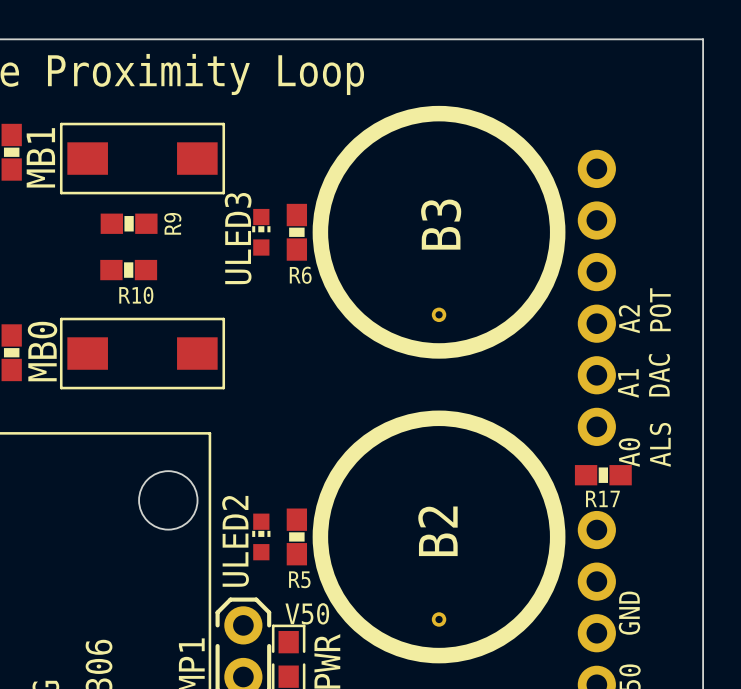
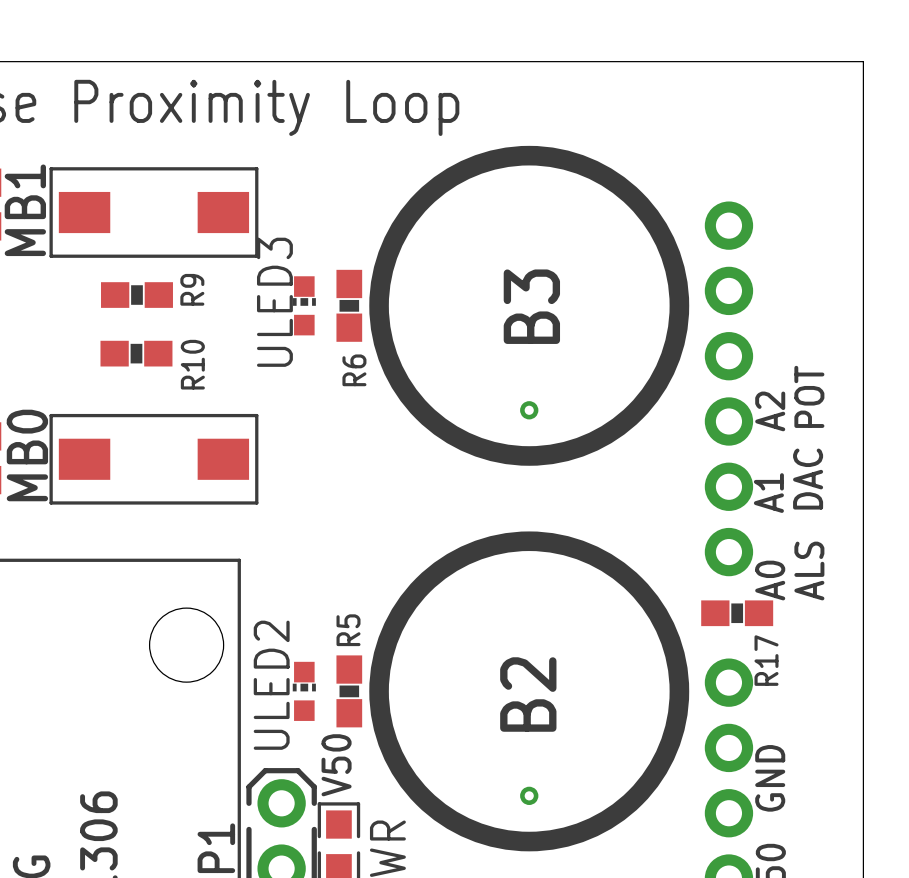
R6 name rotation: 0° (300, 275) -> 90° counterclockwise (354, 370)
R10 name rotation: 0° (136, 295) -> 90° counterclockwise (192, 364)
R17 name rotation: 0° (602, 498) -> 90° counterclockwise (766, 660)
R5 name rotation: 0° (299, 579) -> 90° counterclockwise (348, 630)
R5 name position: R5 (299, 579) -> R5 (348, 630)
text rotation: 0° (307, 613) -> 90° counterclockwise (336, 765)

